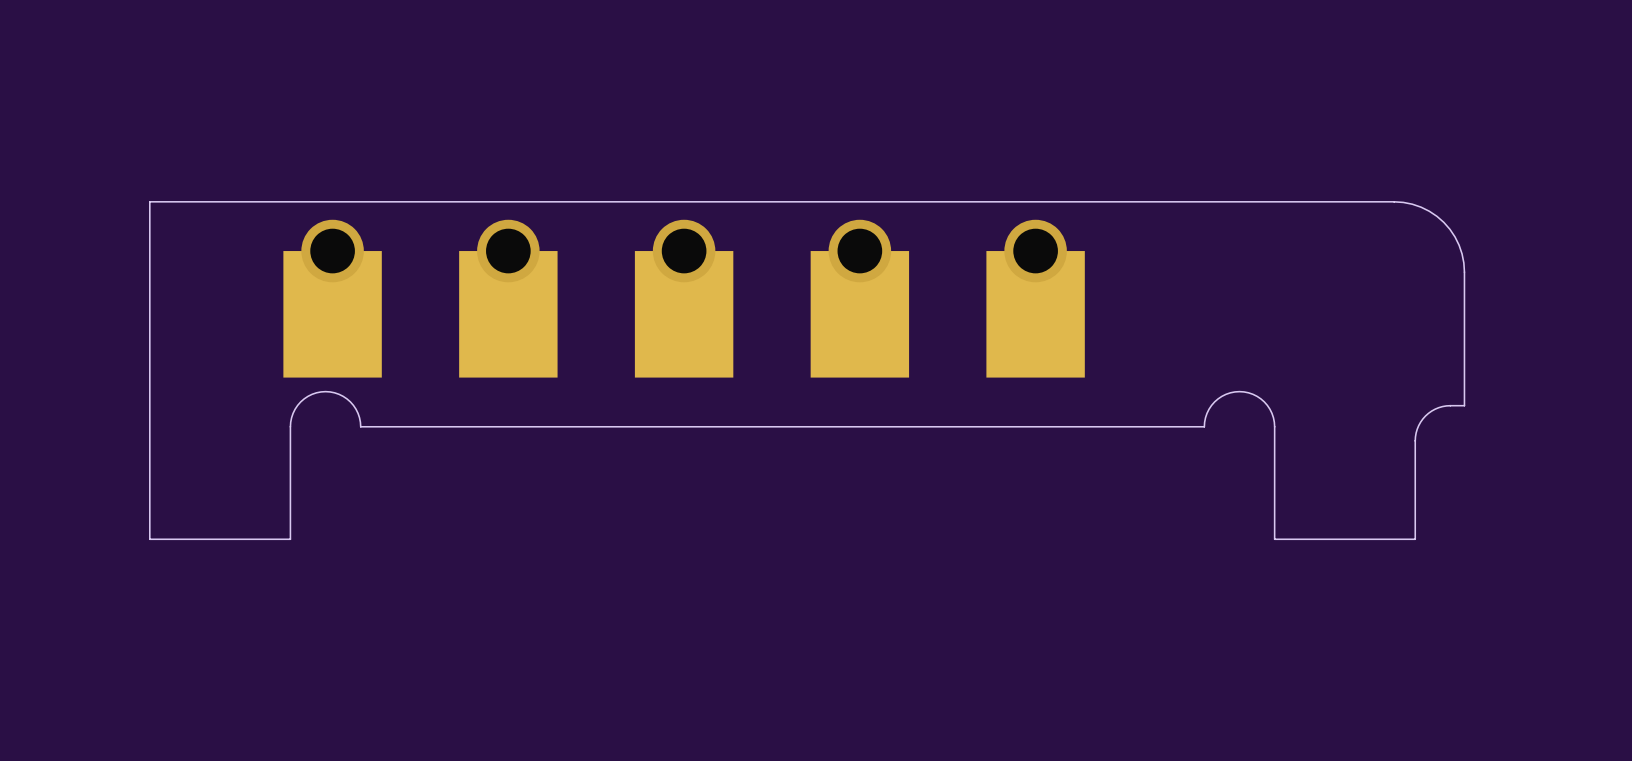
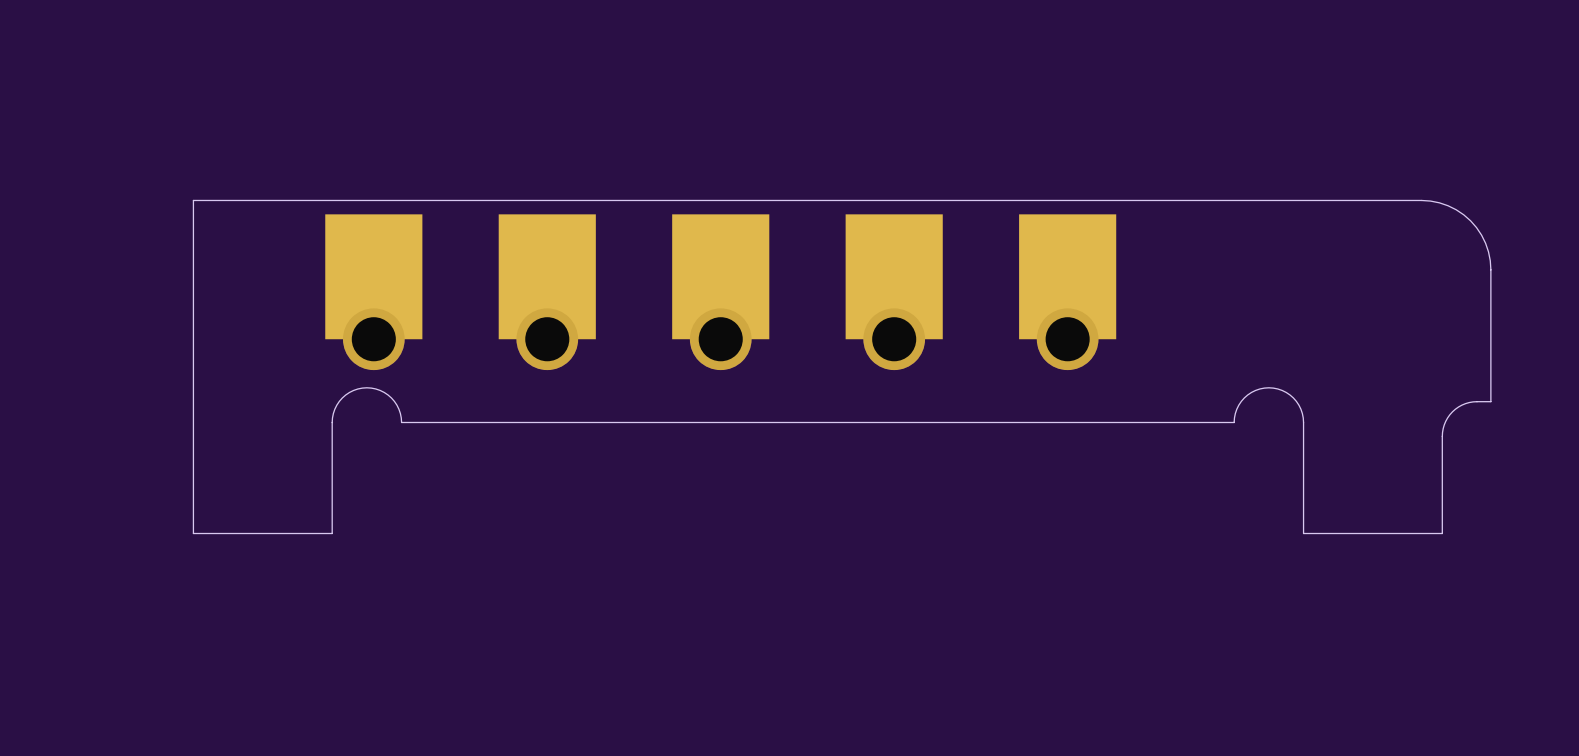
via position: (332, 251) -> (373, 339)
via position: (508, 251) -> (547, 339)
via position: (684, 251) -> (720, 339)
via position: (859, 251) -> (894, 339)
via position: (1035, 251) -> (1067, 339)
part position: (332, 314) -> (373, 276)
part position: (508, 314) -> (547, 276)
part position: (684, 314) -> (720, 276)
part position: (859, 314) -> (894, 276)
part position: (1035, 314) -> (1067, 276)

